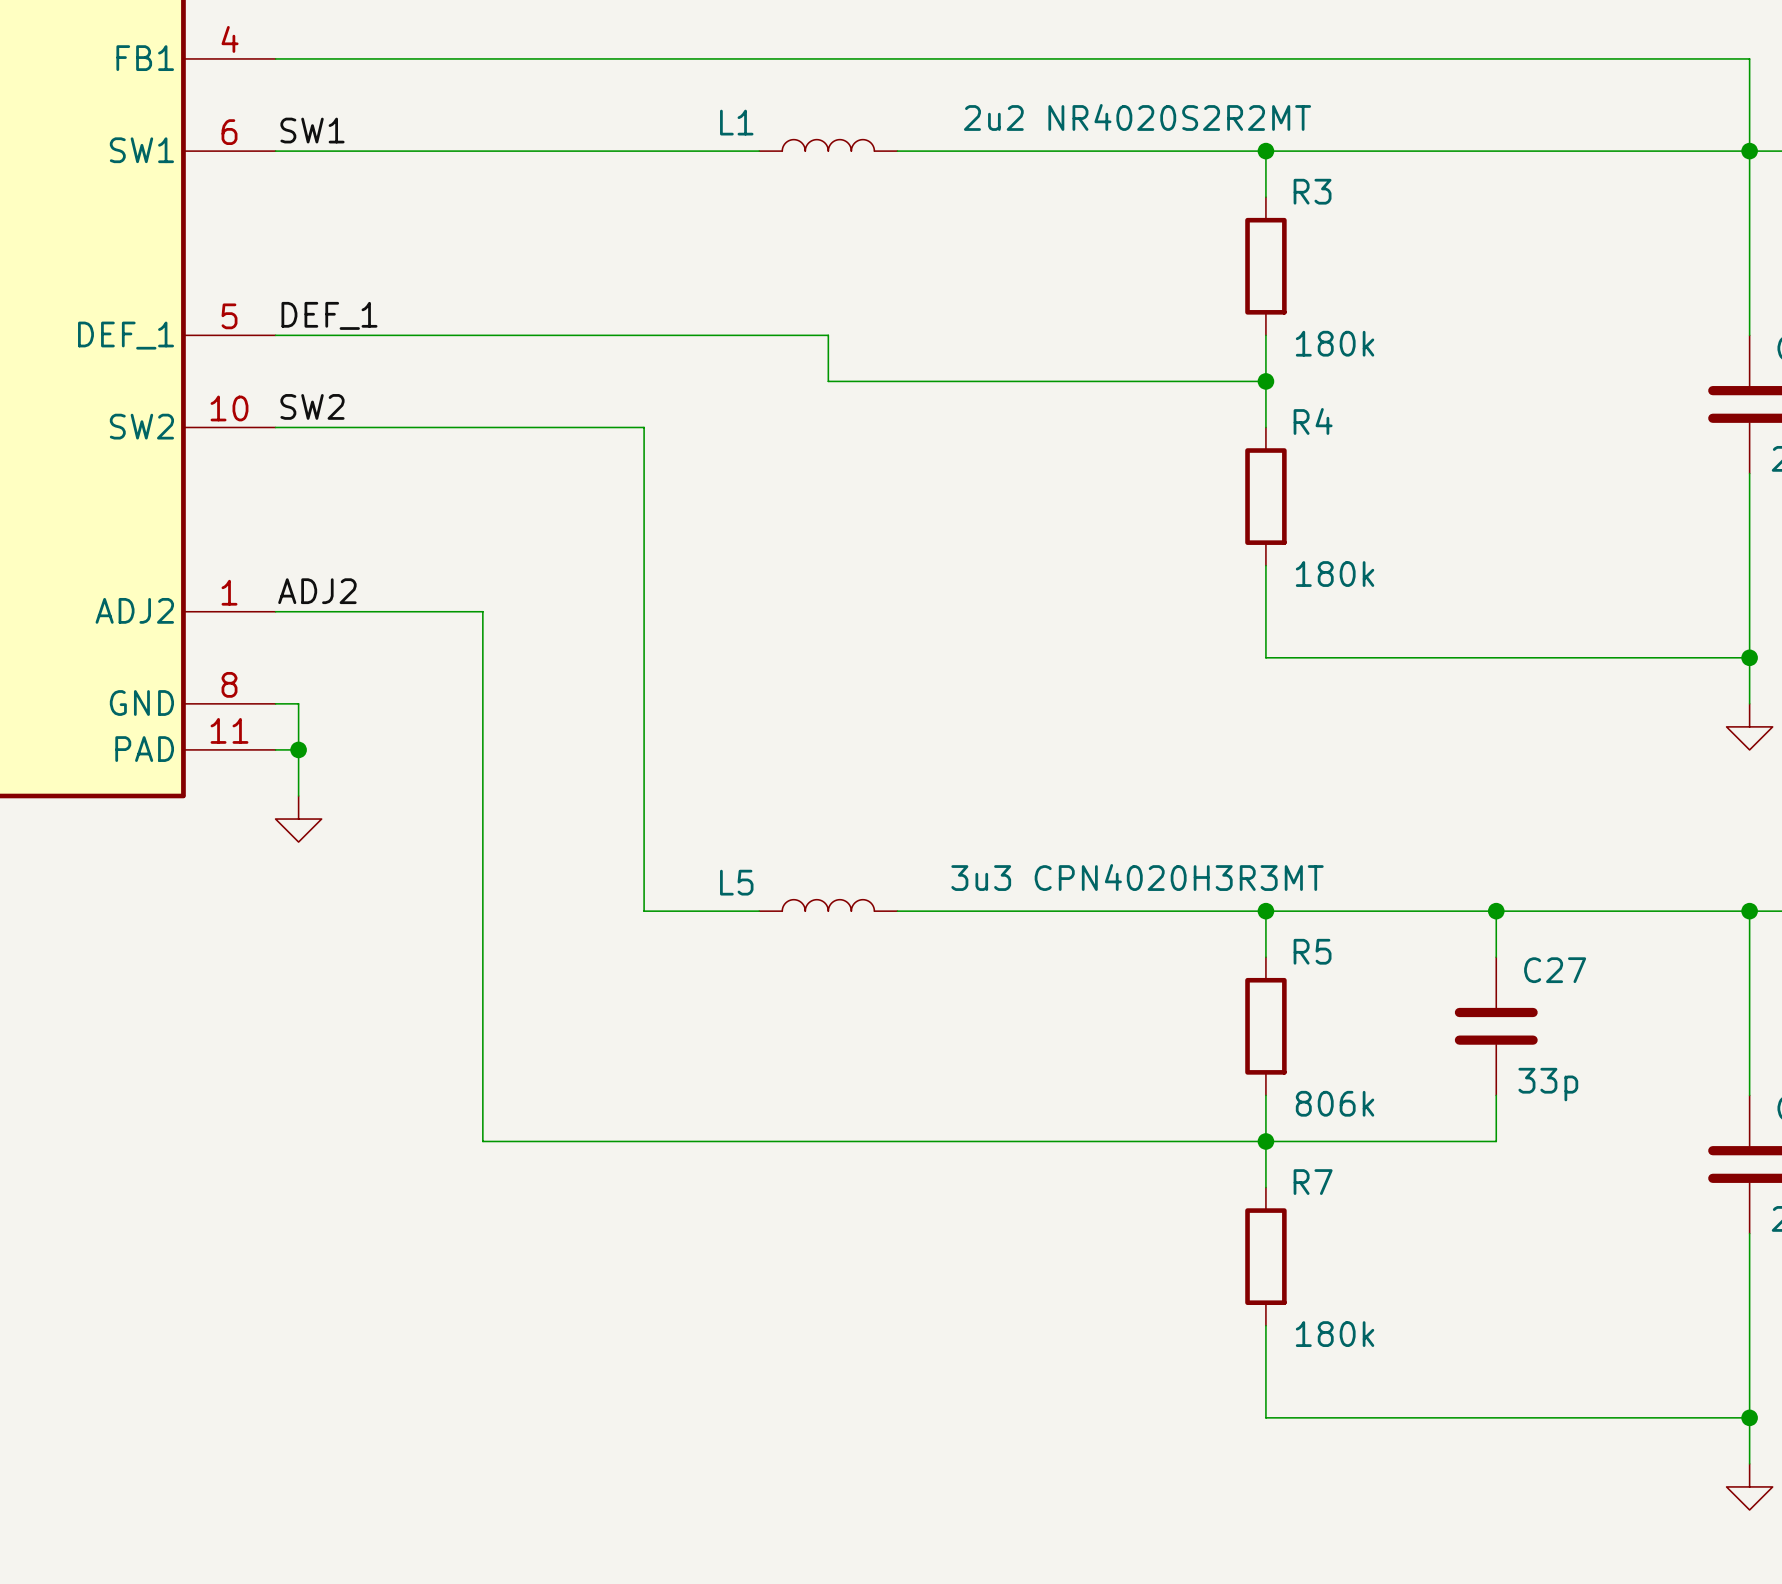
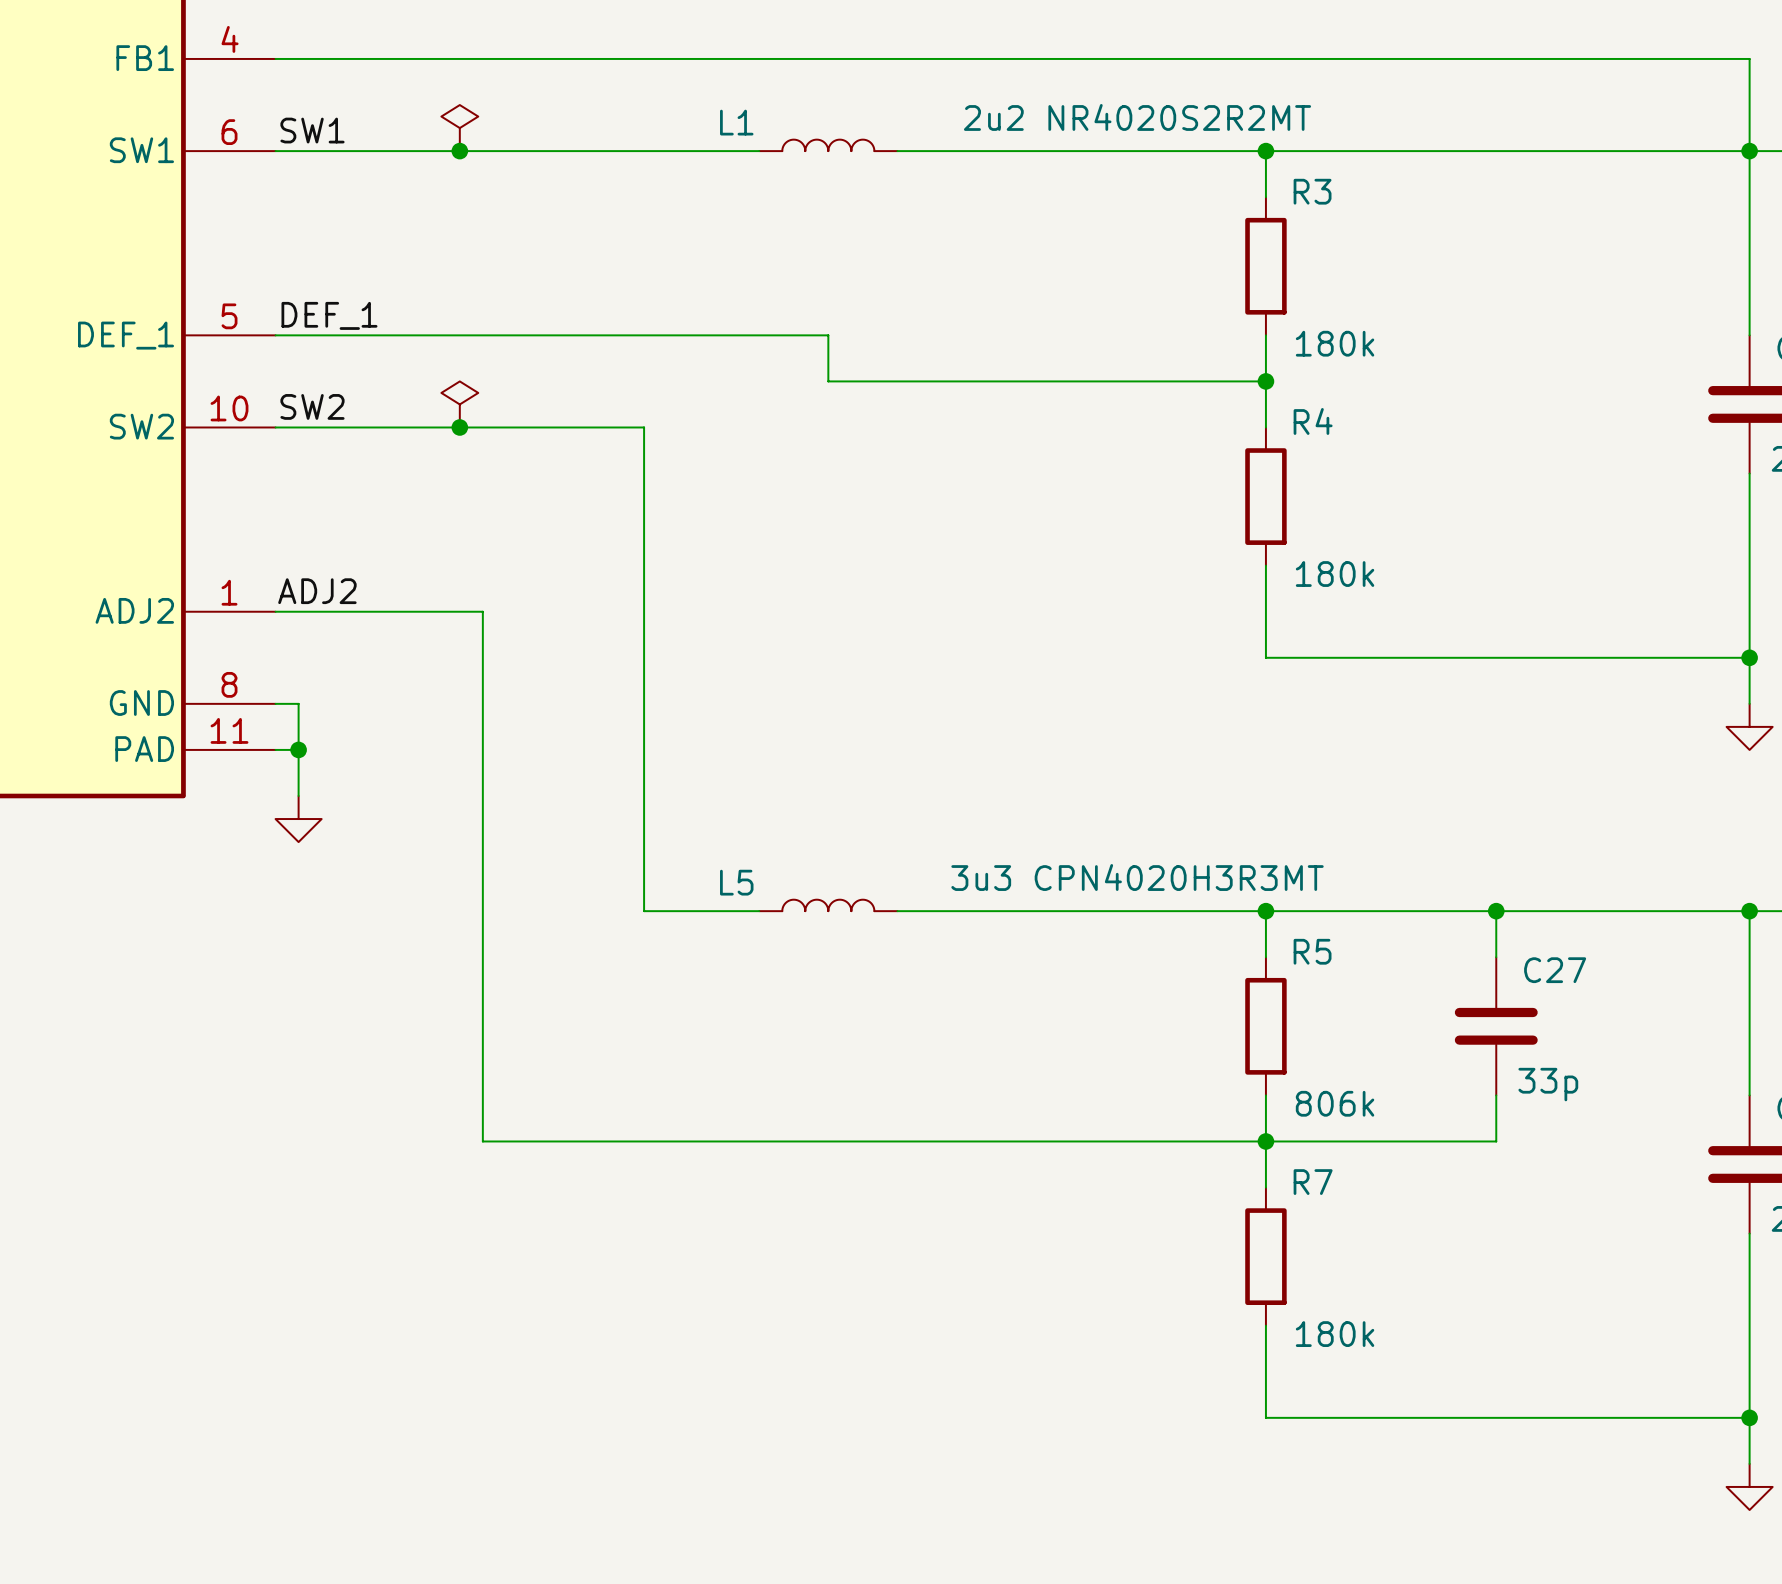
power symbol: none -> (459, 128)
junction: none -> (459, 151)
power symbol: none -> (459, 404)
junction: none -> (459, 427)

